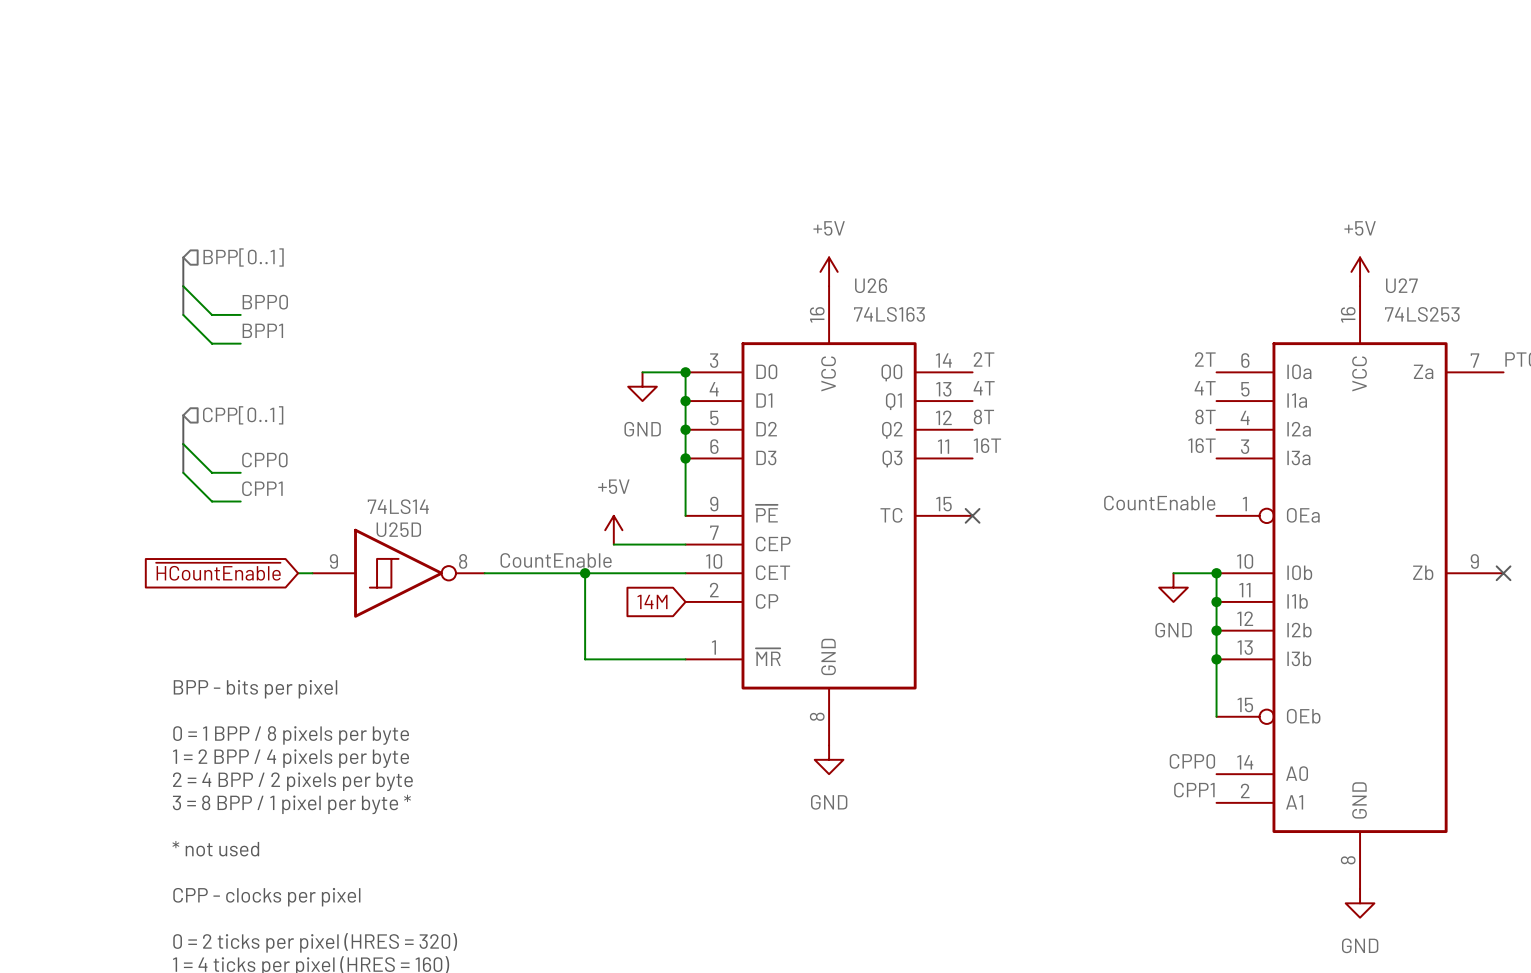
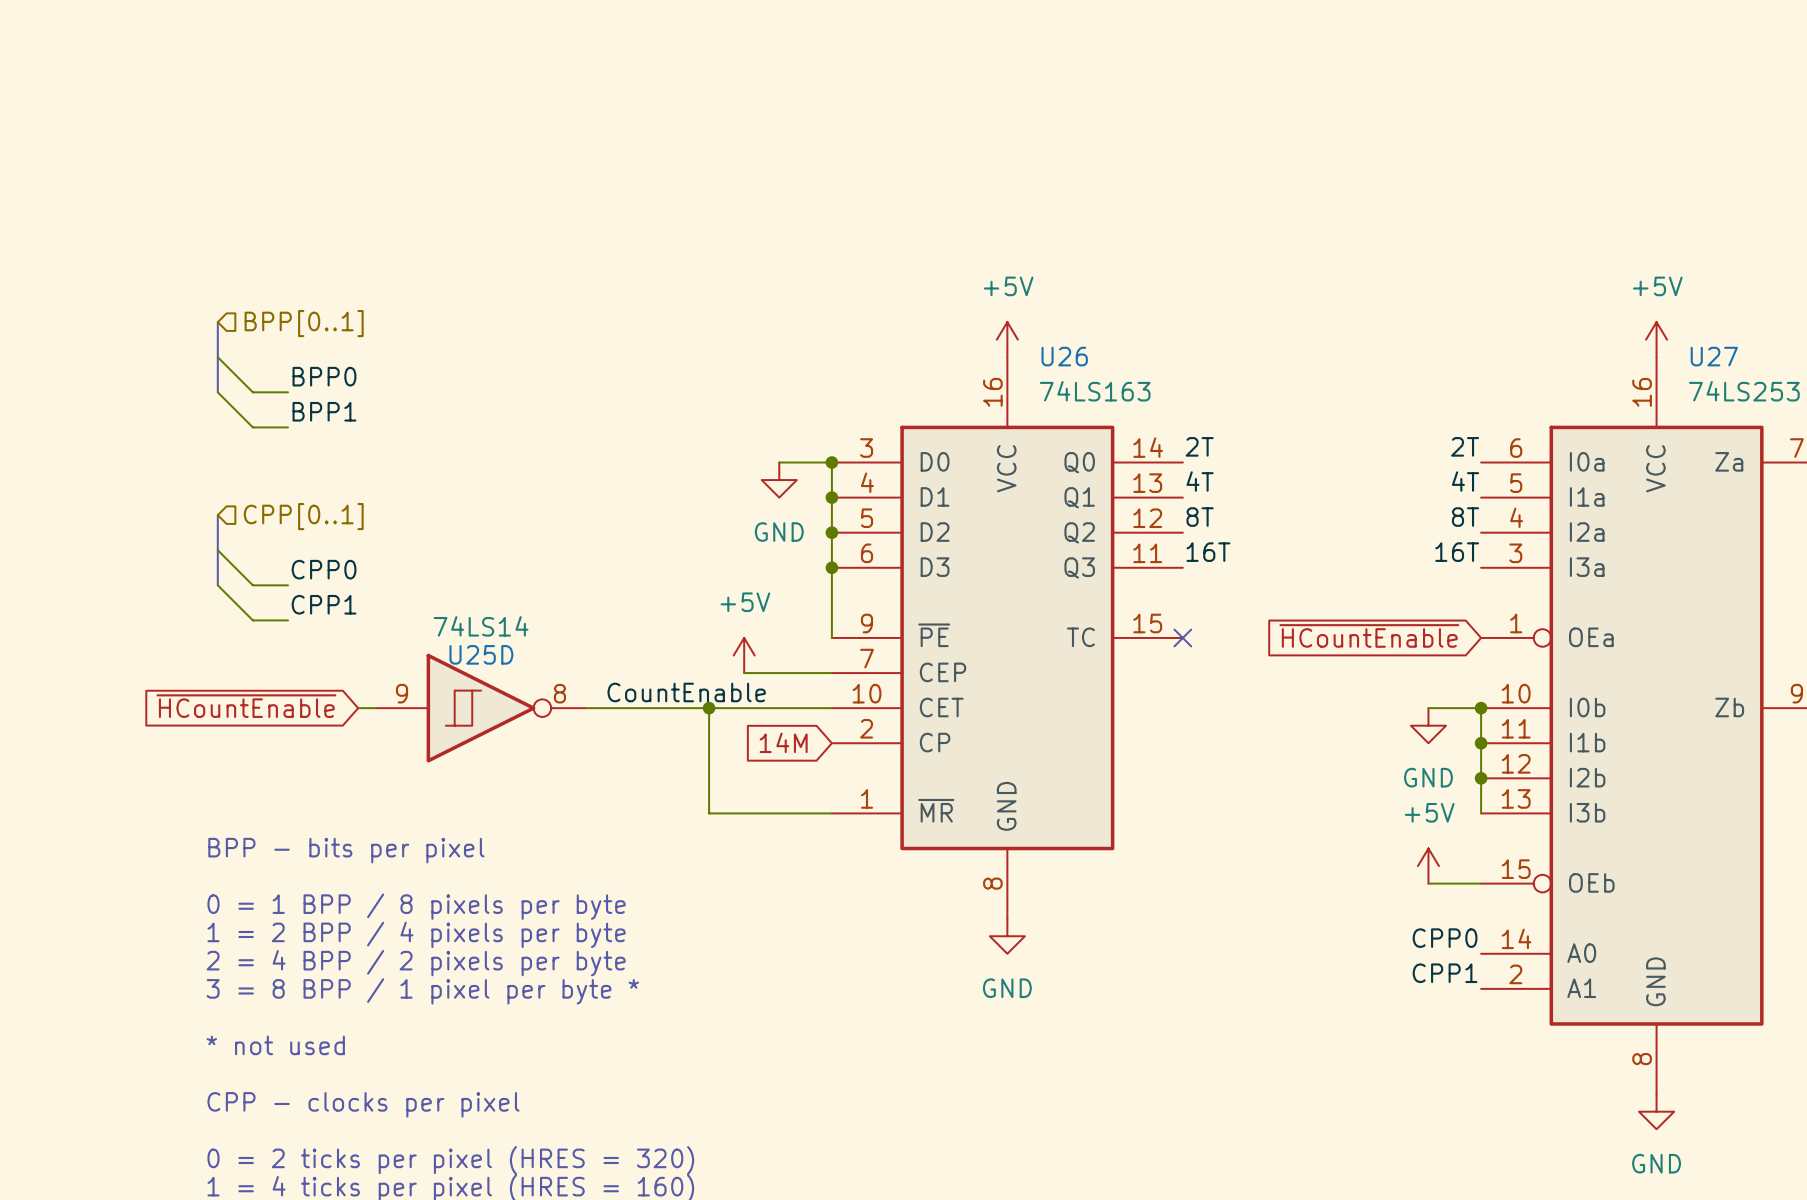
label: CountEnable (1159, 503) -> none
global label: none -> ~{HCountEnable} (1369, 635)
wire: (1216, 659) (1216, 716) -> (1428, 883) (1481, 883)
junction: (1216, 659) -> none
power symbol: none -> +5V (1428, 866)

